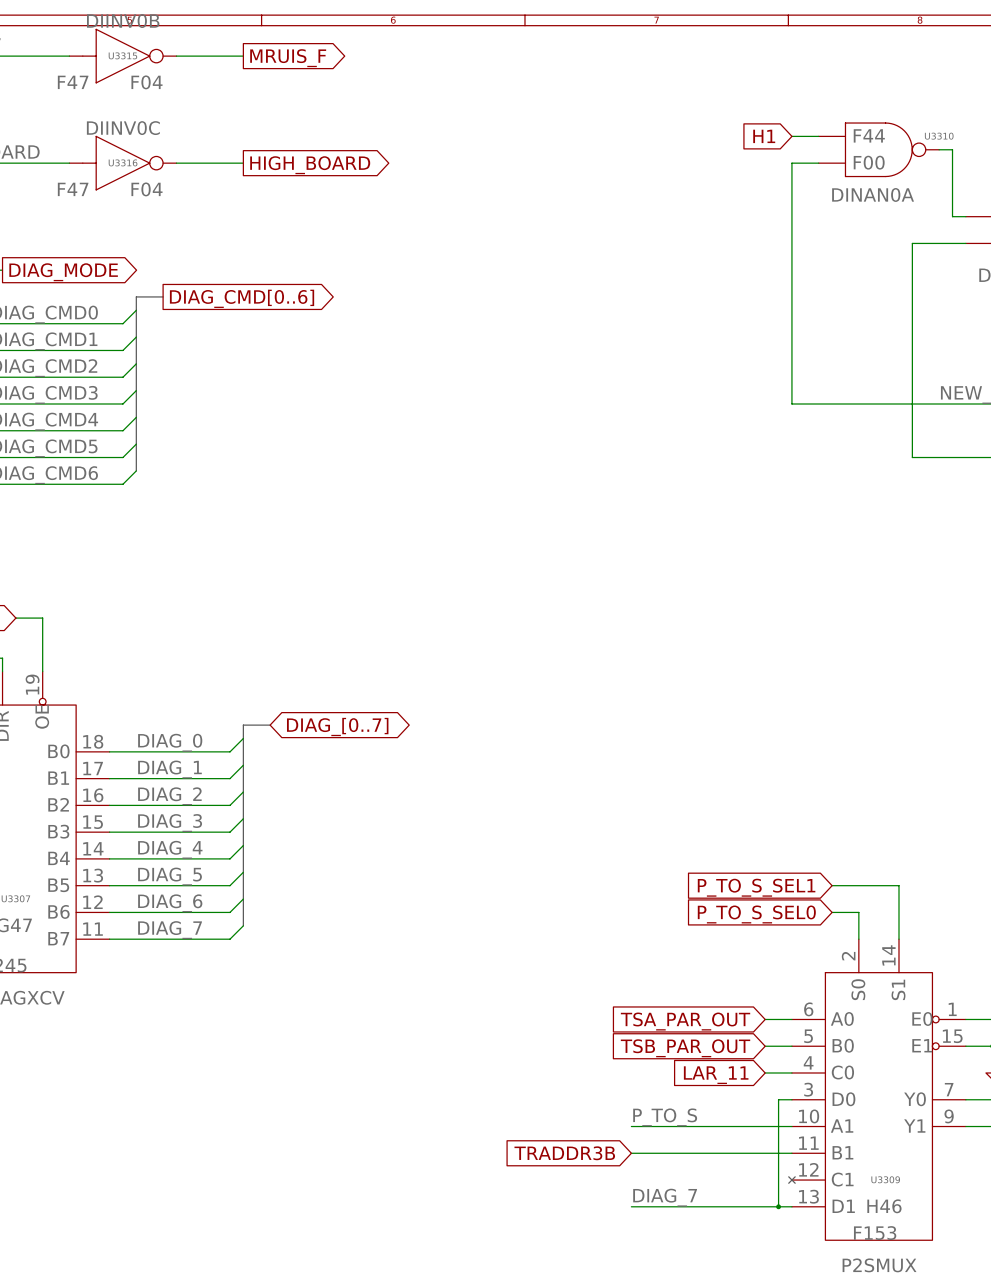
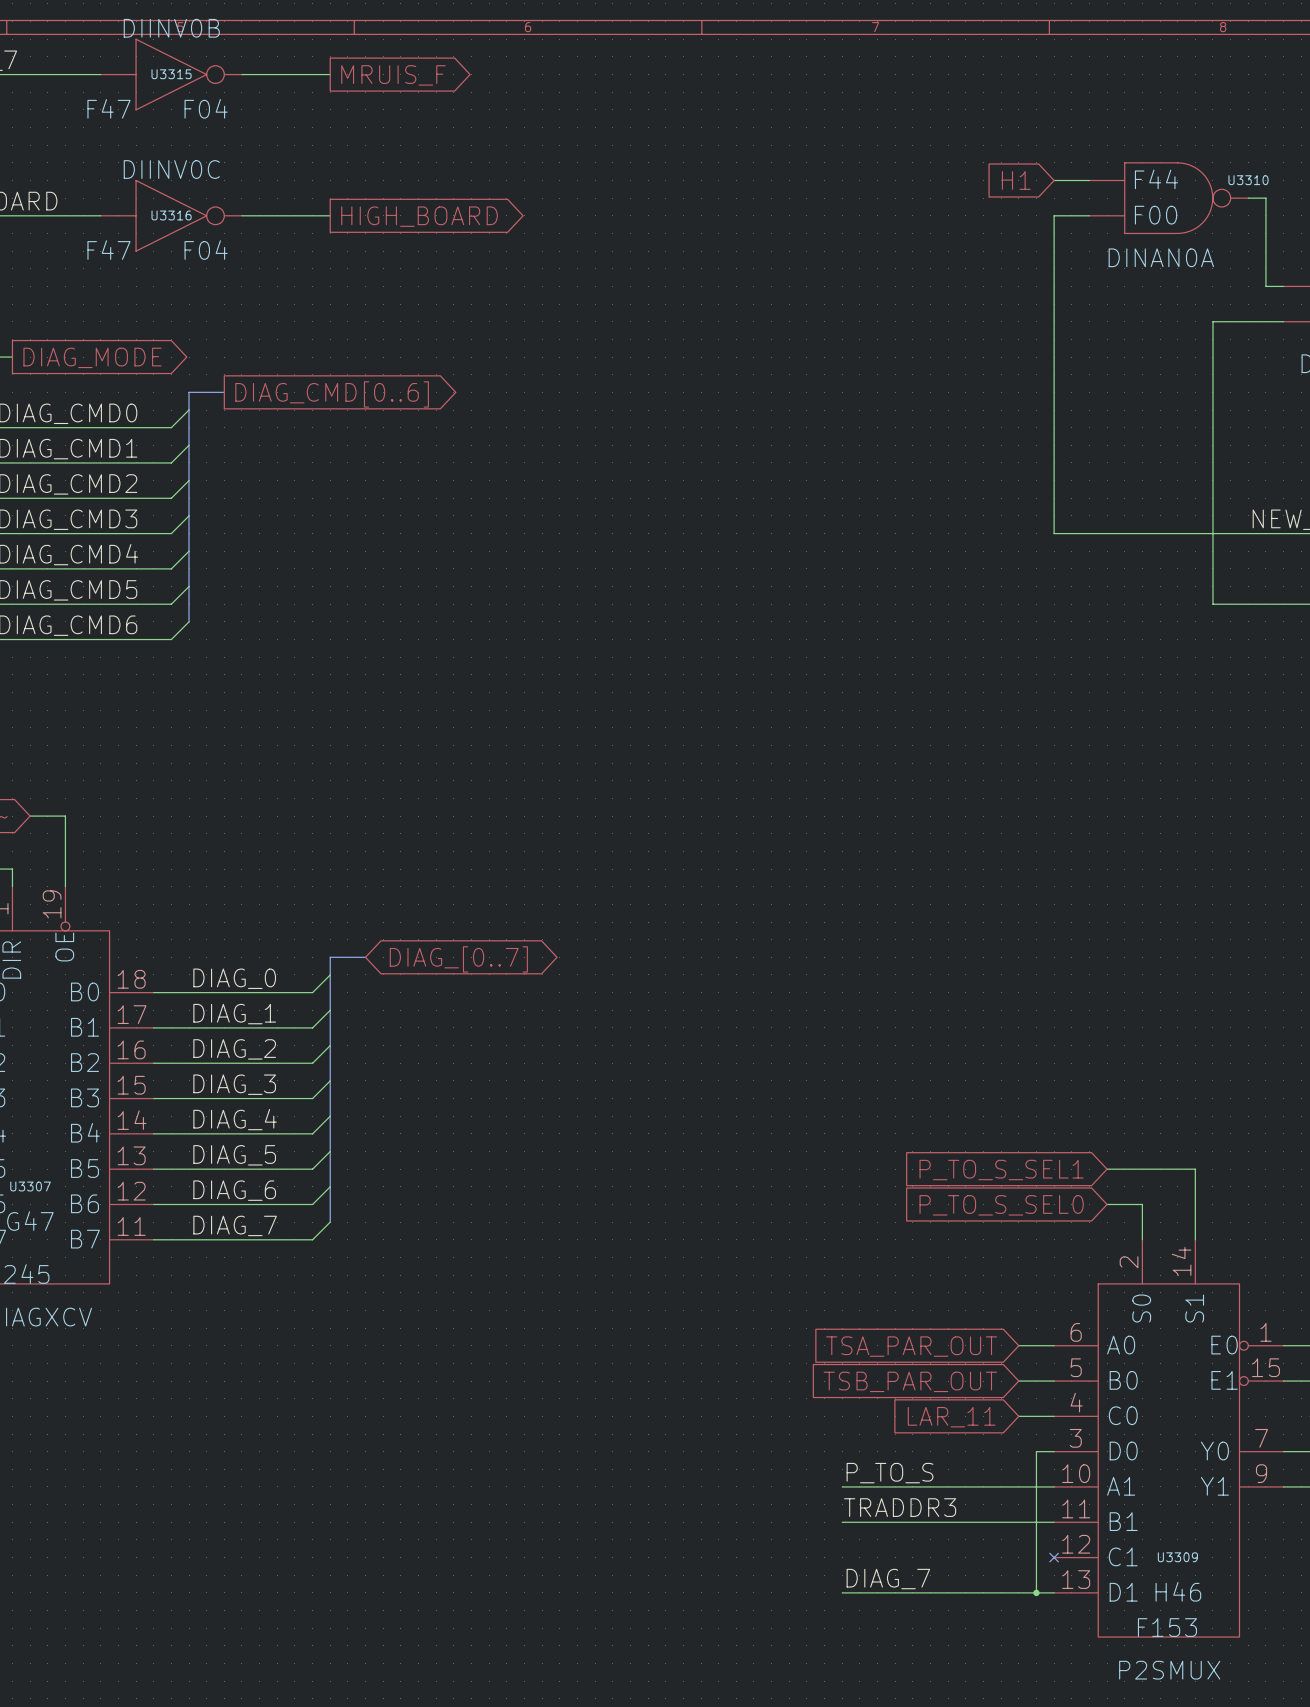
label: none -> TRADDR3 (900, 1507)
global label: TRADDR3B (564, 1153) -> none

